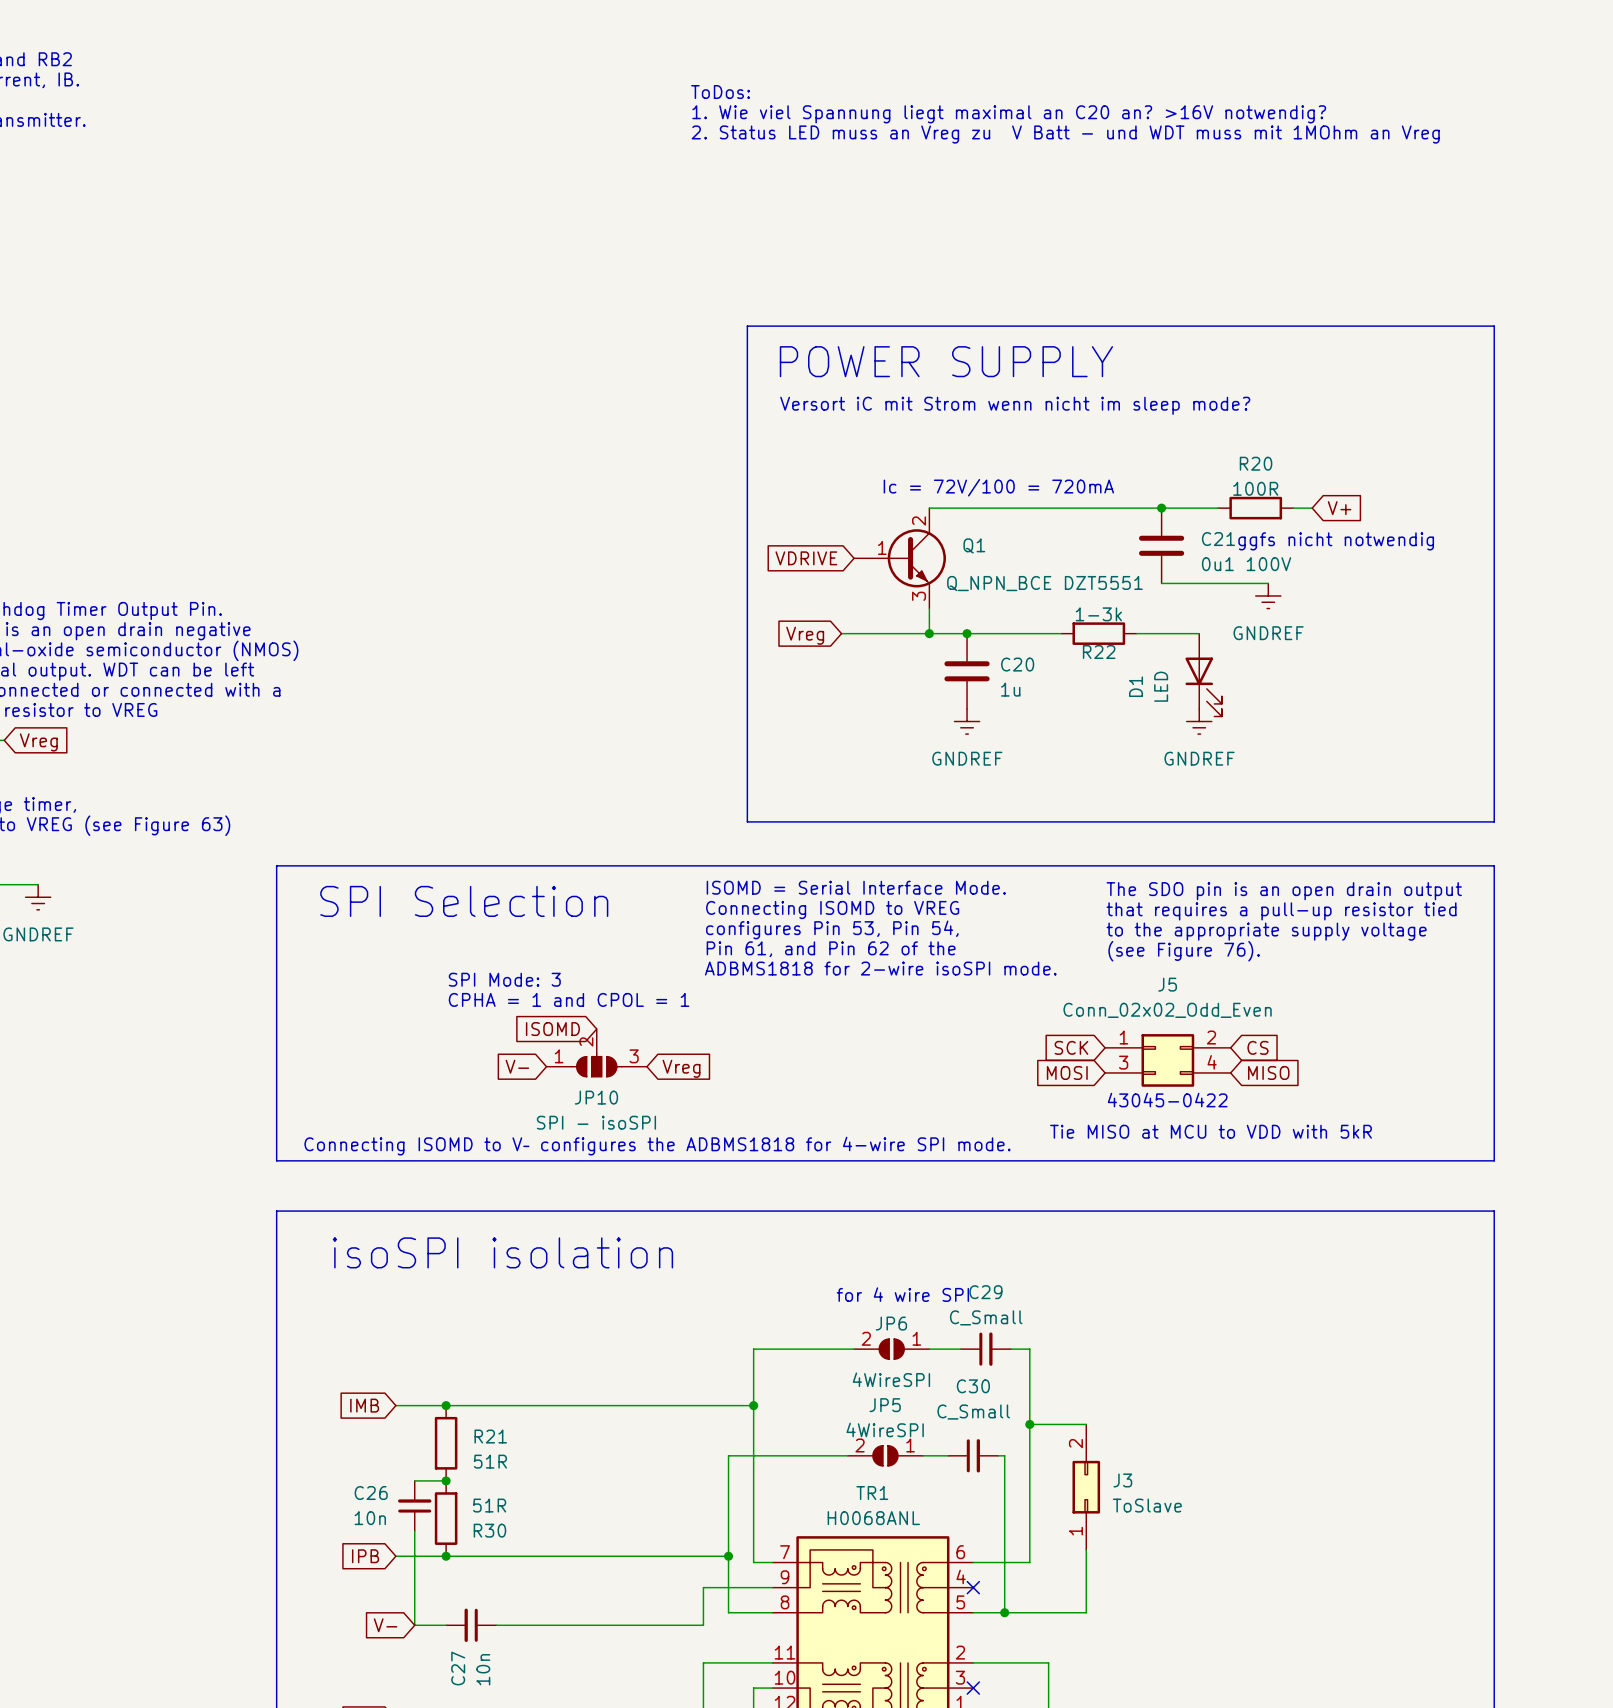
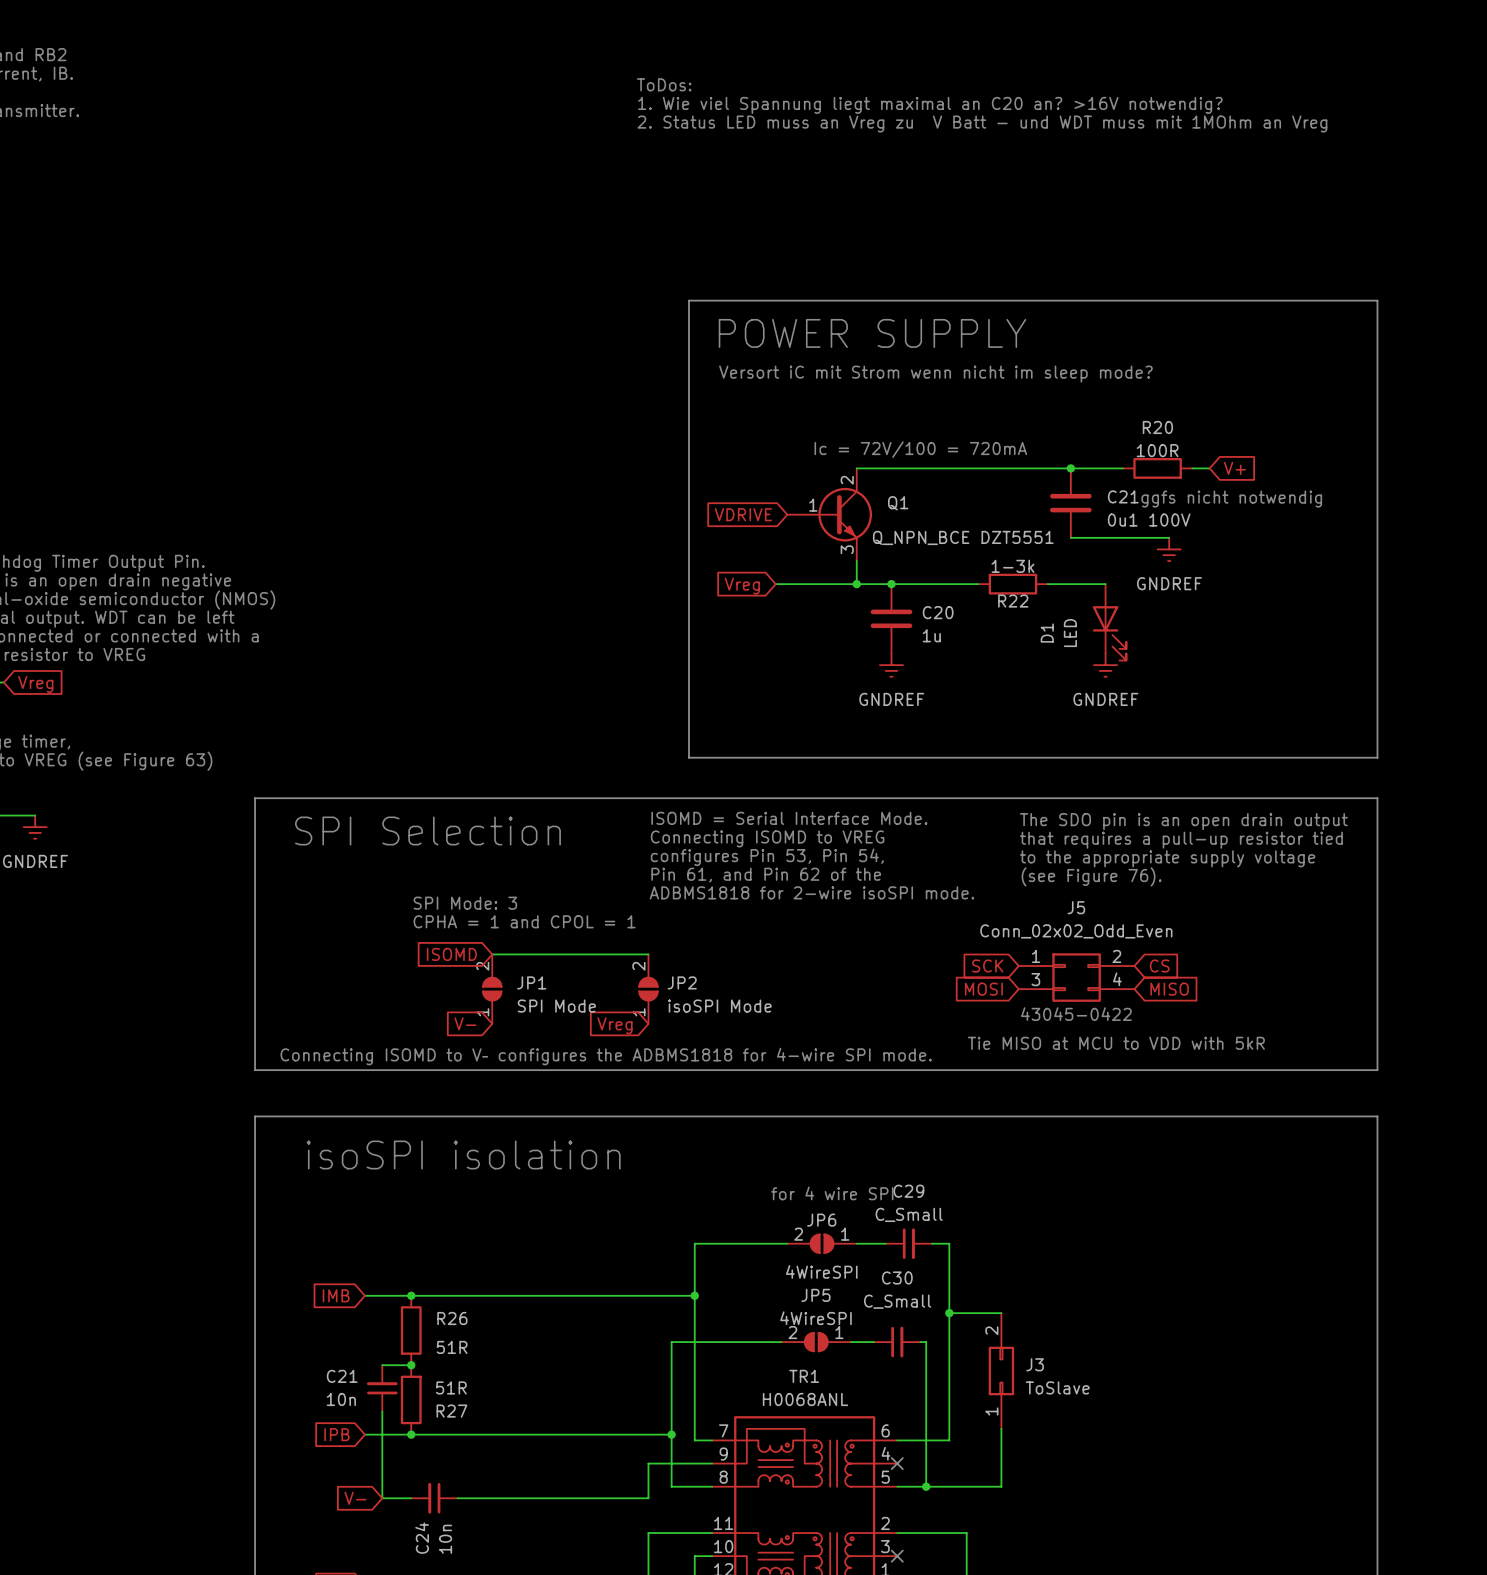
global label position: ISOMD (552, 1029) -> ISOMD (451, 954)
wire: none -> (492, 954) (648, 954)
JP10: SPI - isoSPI (596, 1052) -> none
global label position: V- (517, 1066) -> V- (465, 1023)
global label rotation: 0° (681, 1068) -> 180° (614, 1025)
JP1: none -> SPI Mode (492, 989)
JP2: none -> isoSPI Mode (648, 989)
R21 name: R21 (490, 1436) -> R26 (452, 1318)
C26 name: C26 (371, 1493) -> C21 (342, 1376)
R30 name: R30 (489, 1530) -> R27 (451, 1411)
C27 name: C27 (458, 1668) -> C24 (422, 1538)

